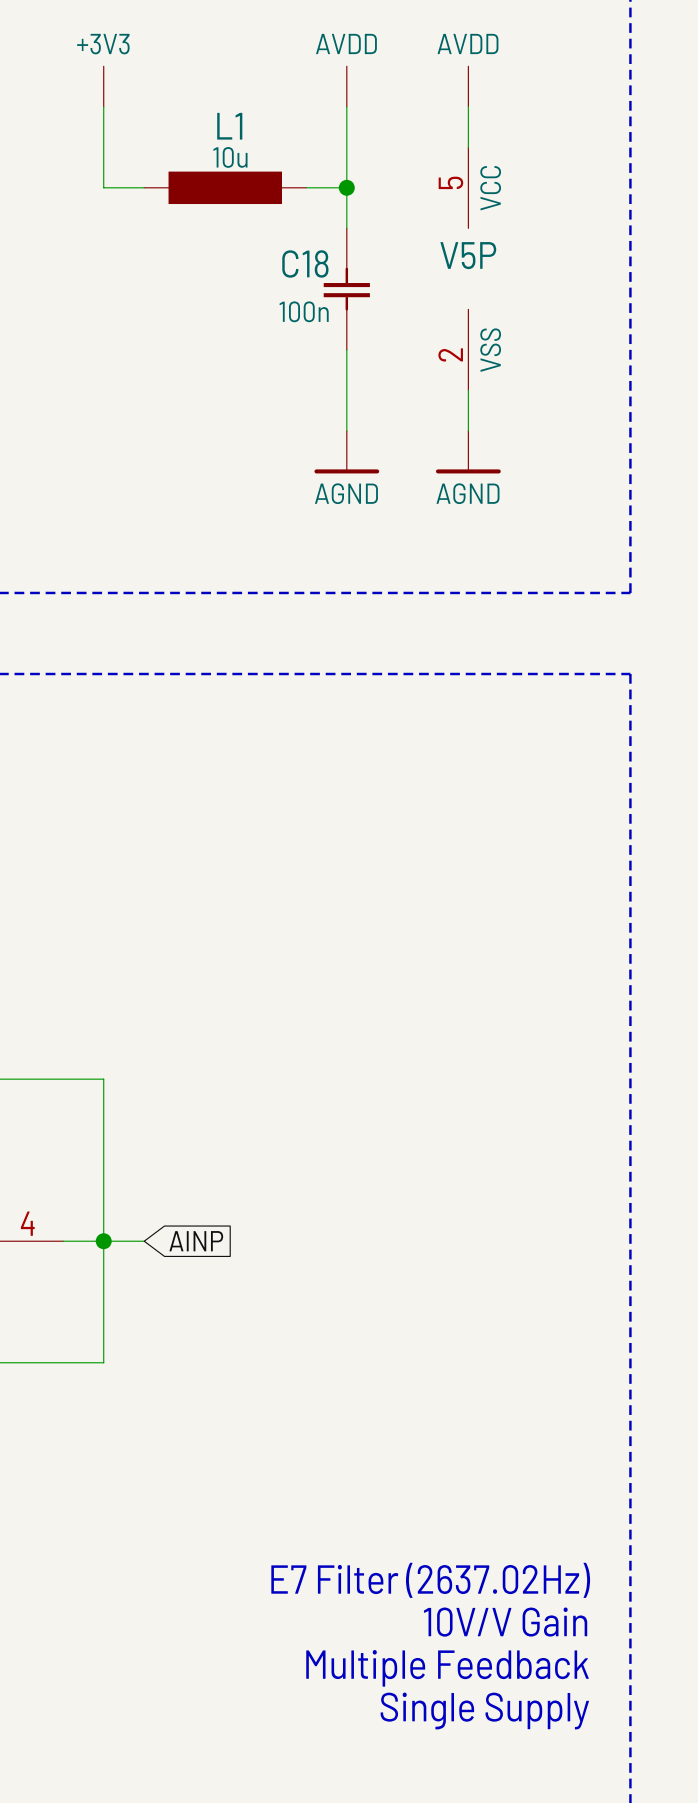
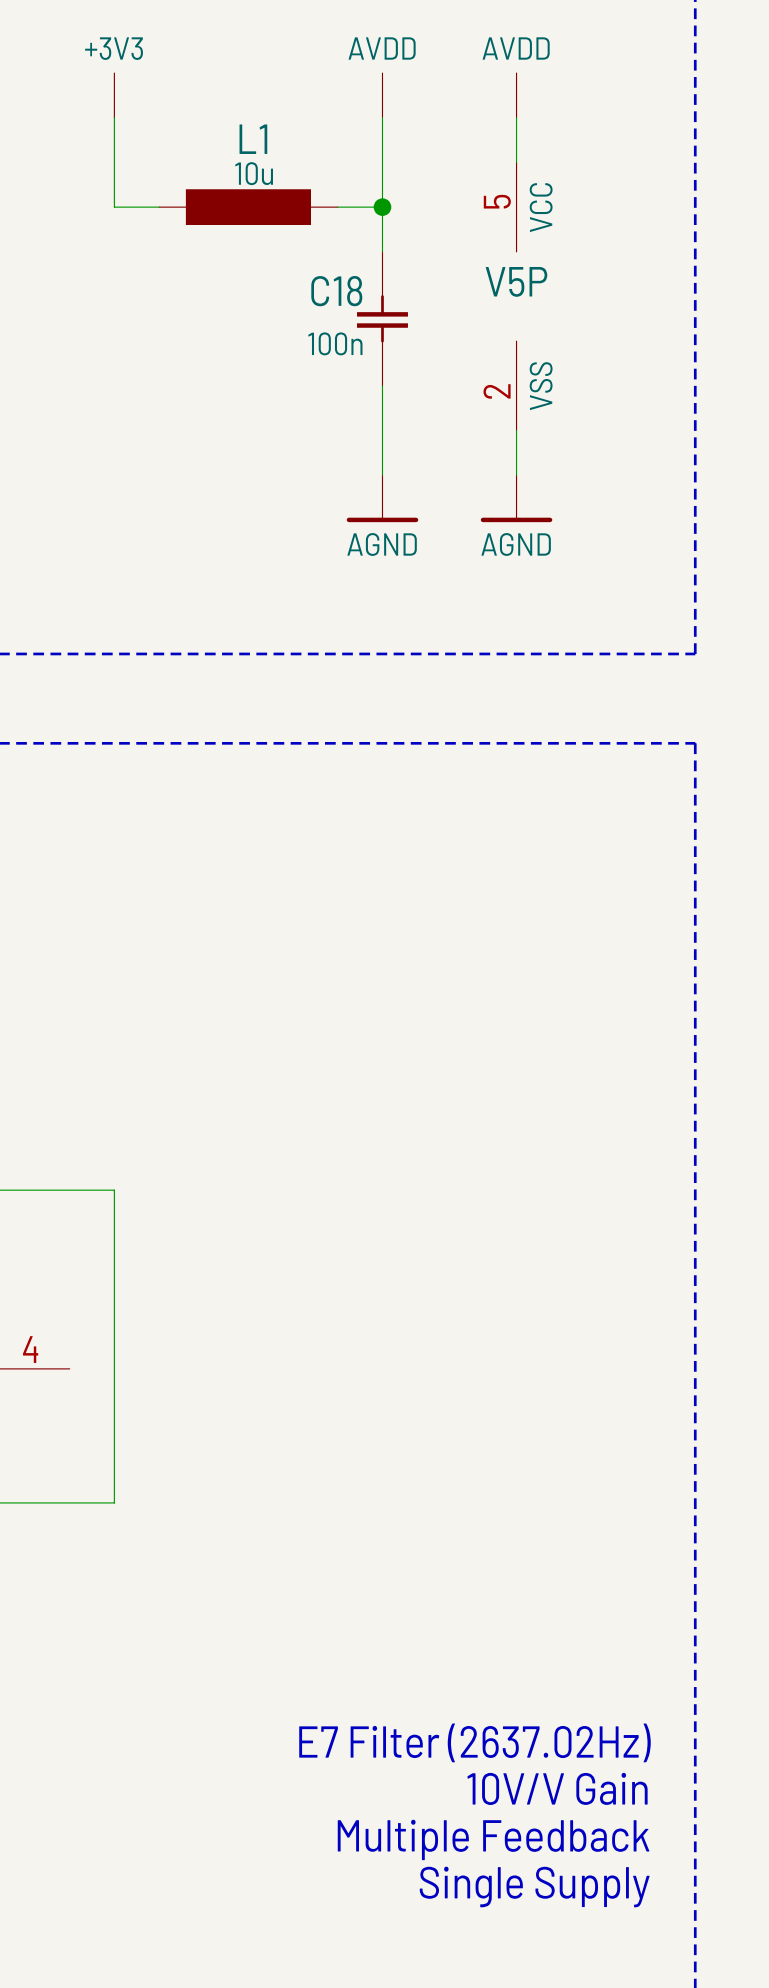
wire: (63, 1241) (144, 1241) -> none
junction: (103, 1241) -> none
global label: AINP (196, 1241) -> none

